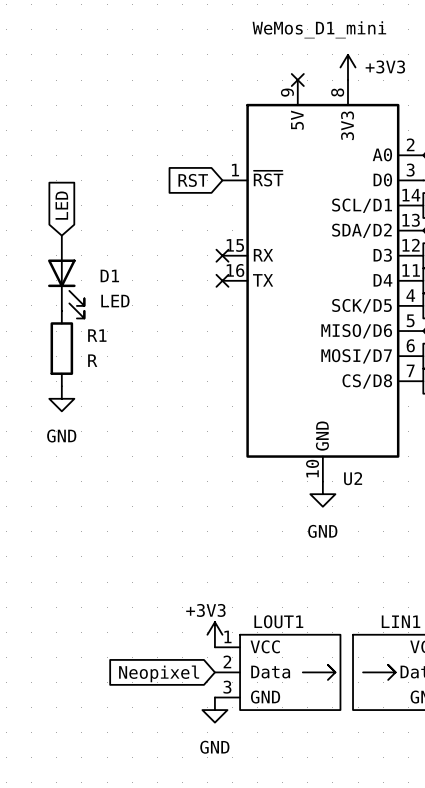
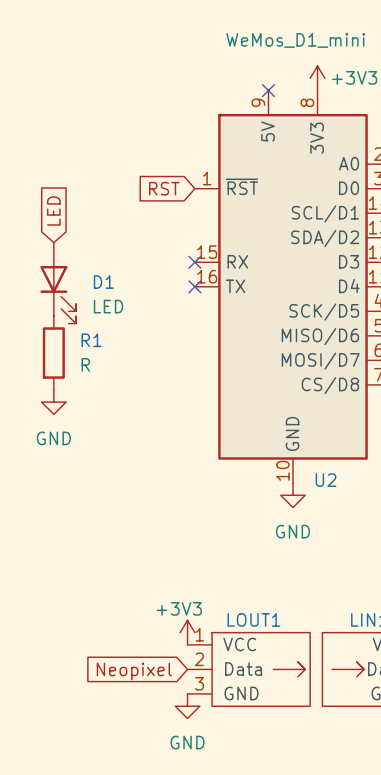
global label position: LED (61, 205) -> LED (53, 210)
D1 position: (66, 277) -> (58, 283)
R1 position: (61, 348) -> (53, 353)
power symbol position: GND (61, 398) -> GND (53, 402)

